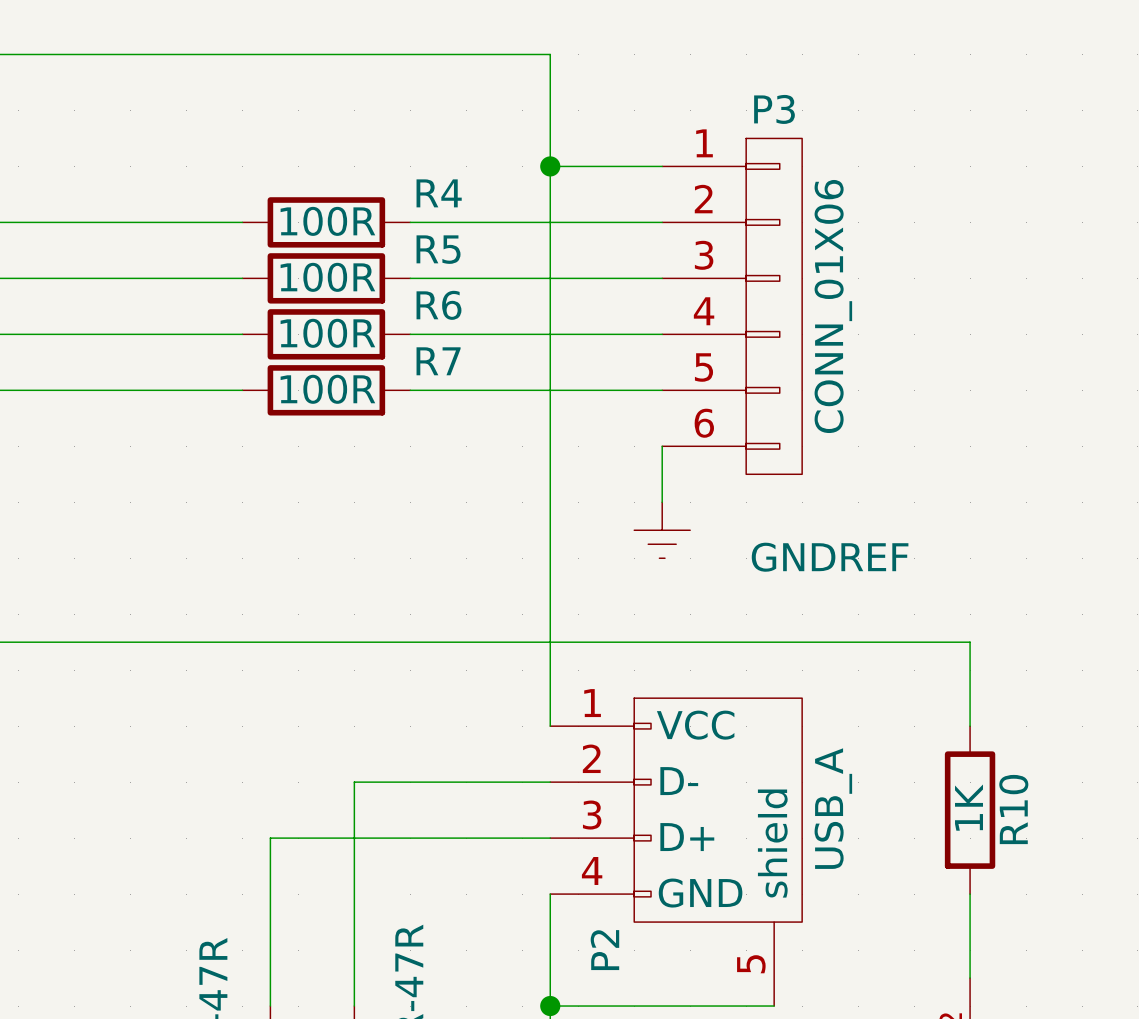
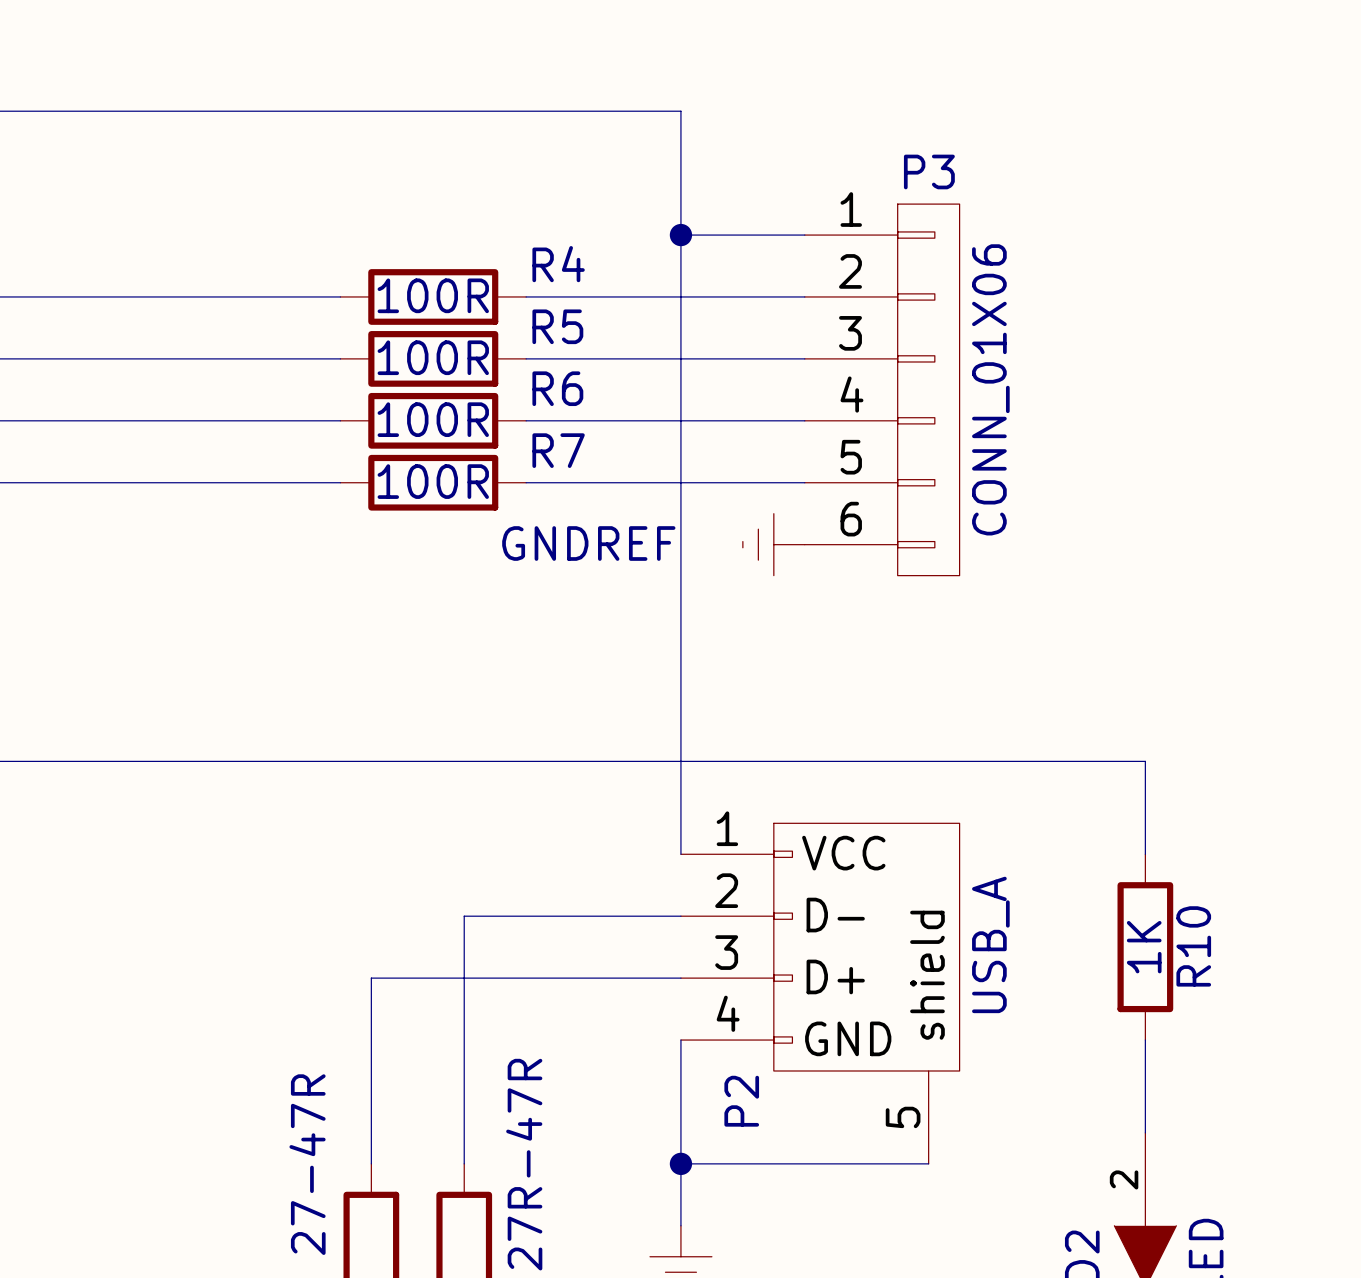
wire: (662, 446) (662, 502) -> none
power symbol rotation: 0° (662, 530) -> 90° clockwise (773, 544)
power symbol position: GNDREF (662, 530) -> GNDREF (773, 544)
power symbol text position: GNDREF (830, 557) -> GNDREF (588, 543)

